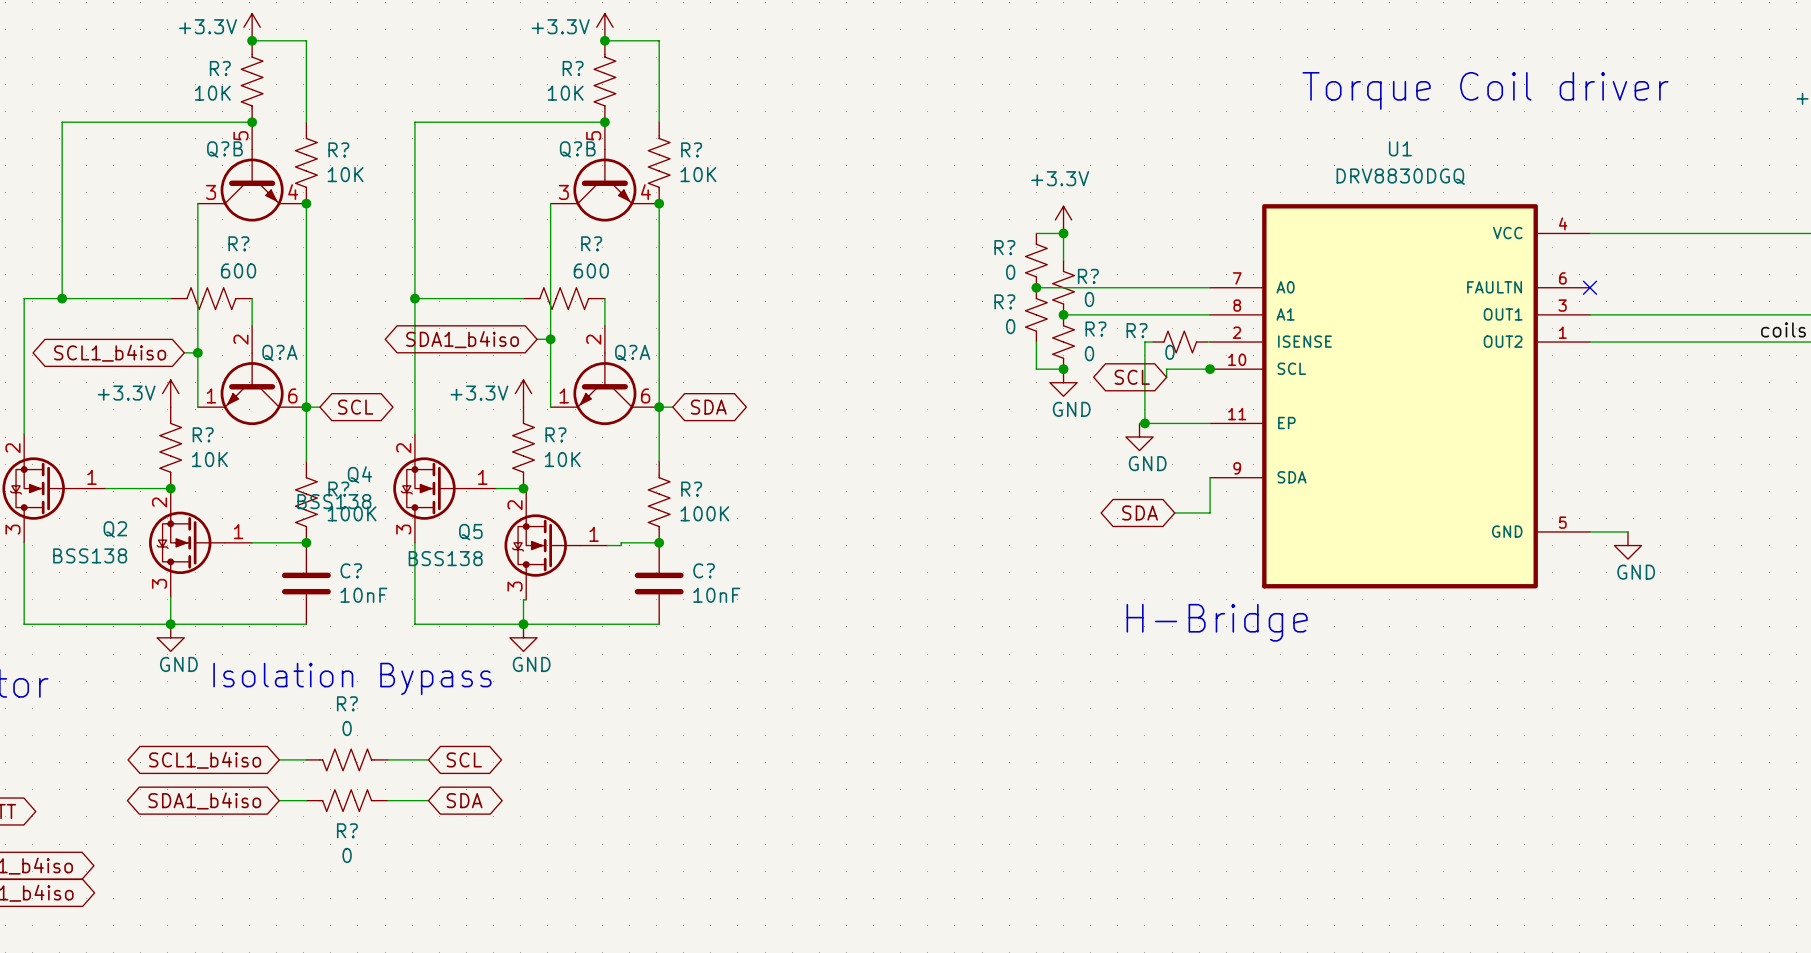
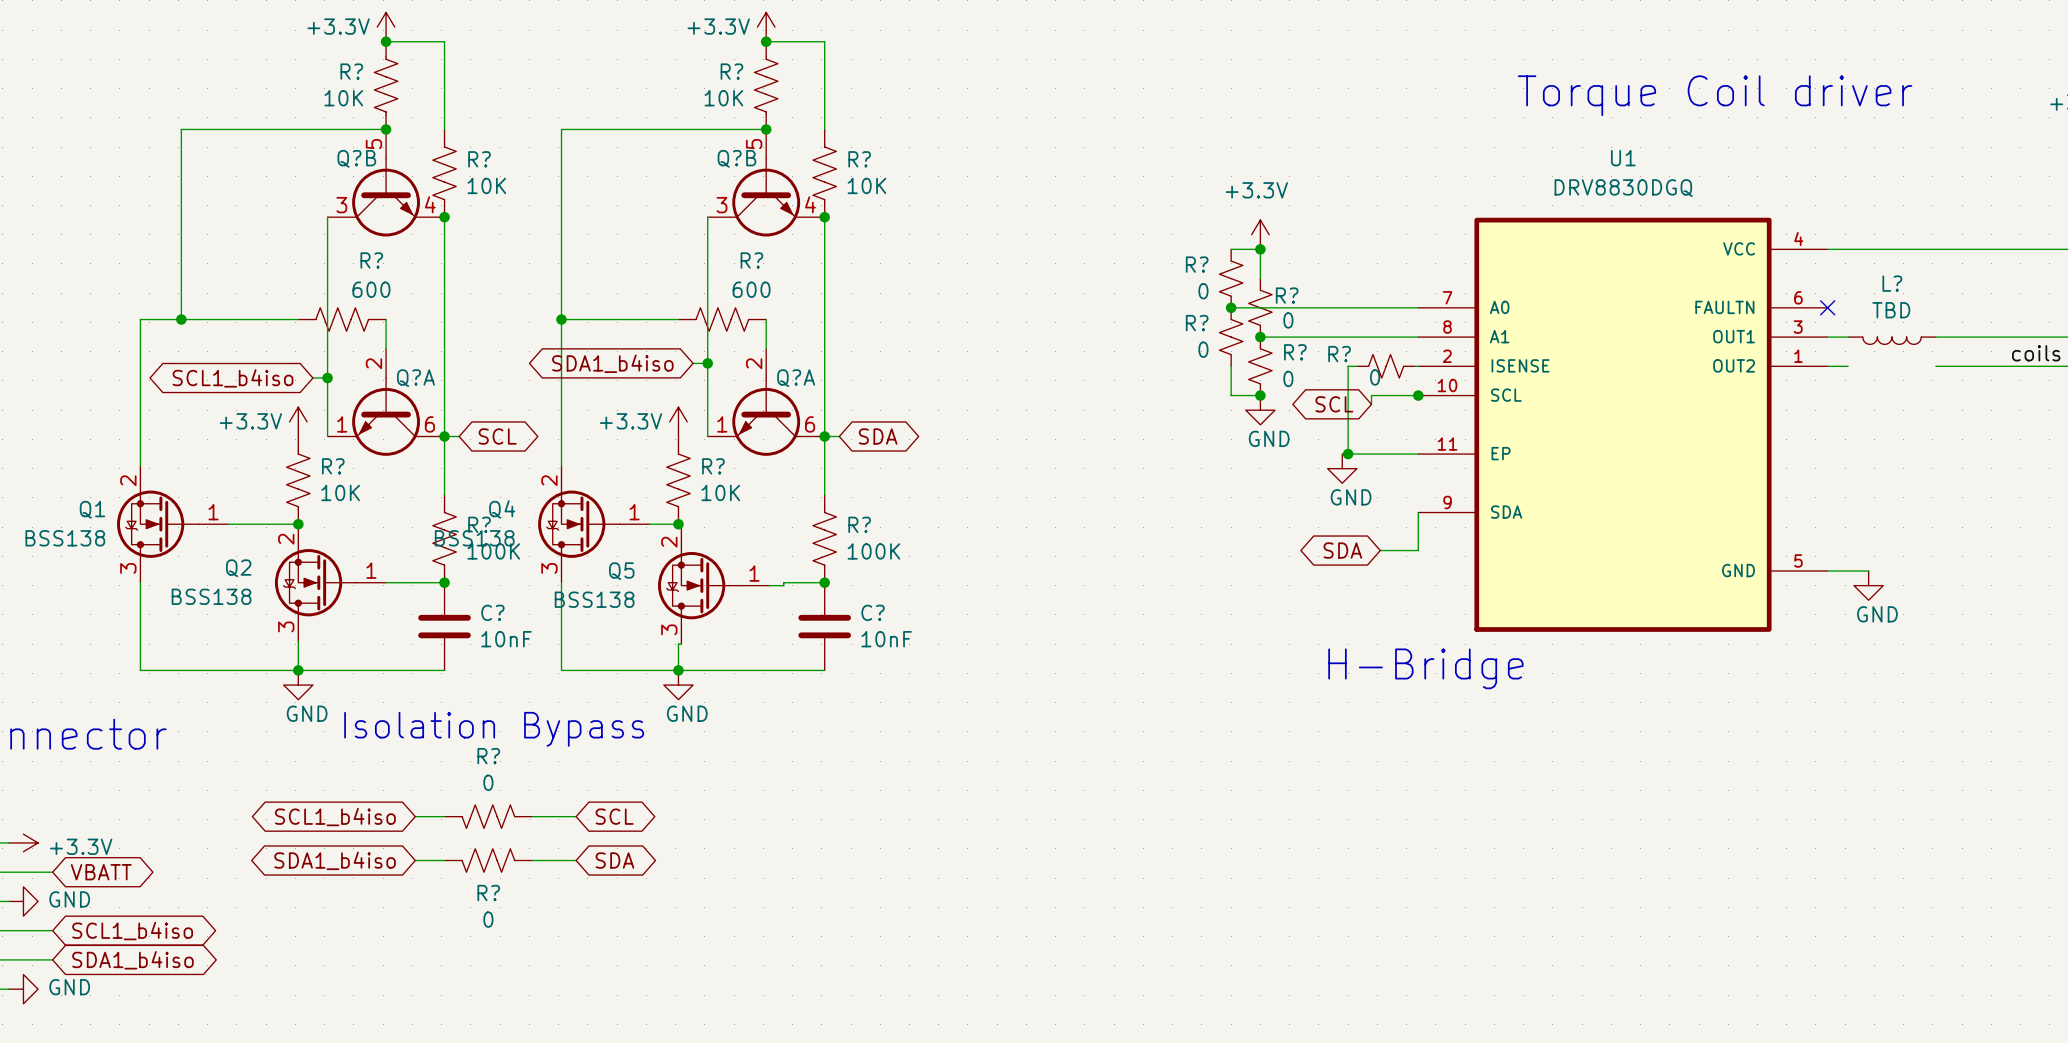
wire: (1608, 314) (1690, 314) -> none
L?: none -> TBD (1892, 340)
wire: (1608, 342) (1690, 342) -> none

